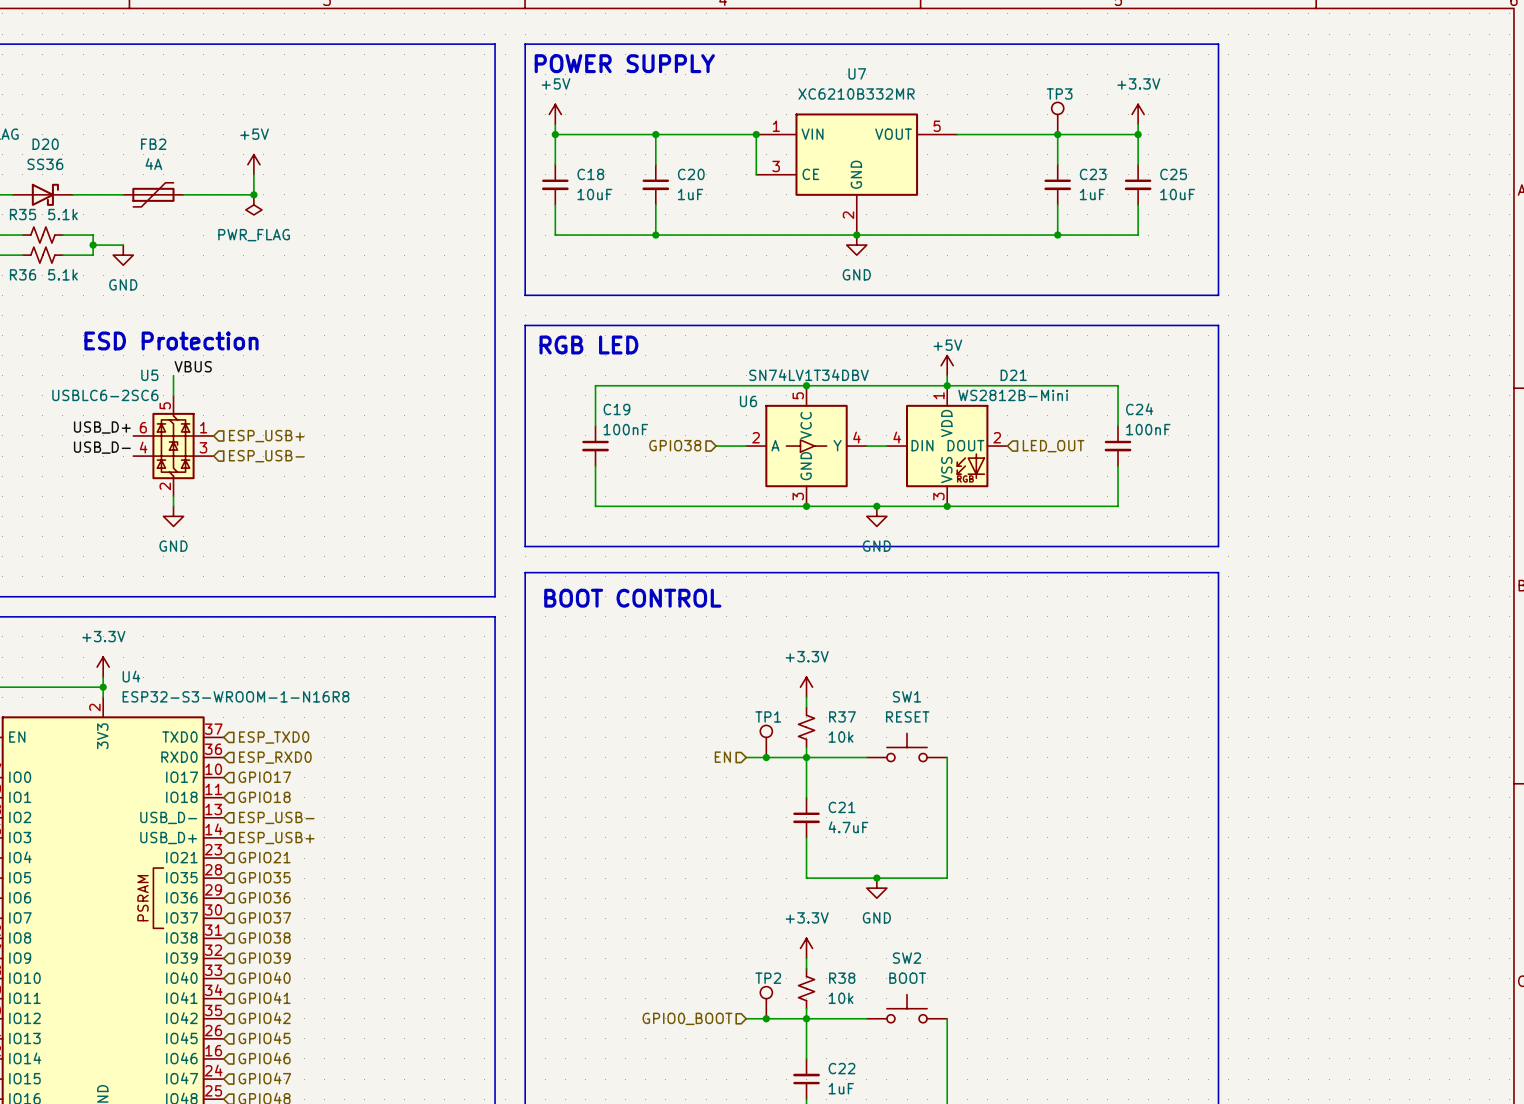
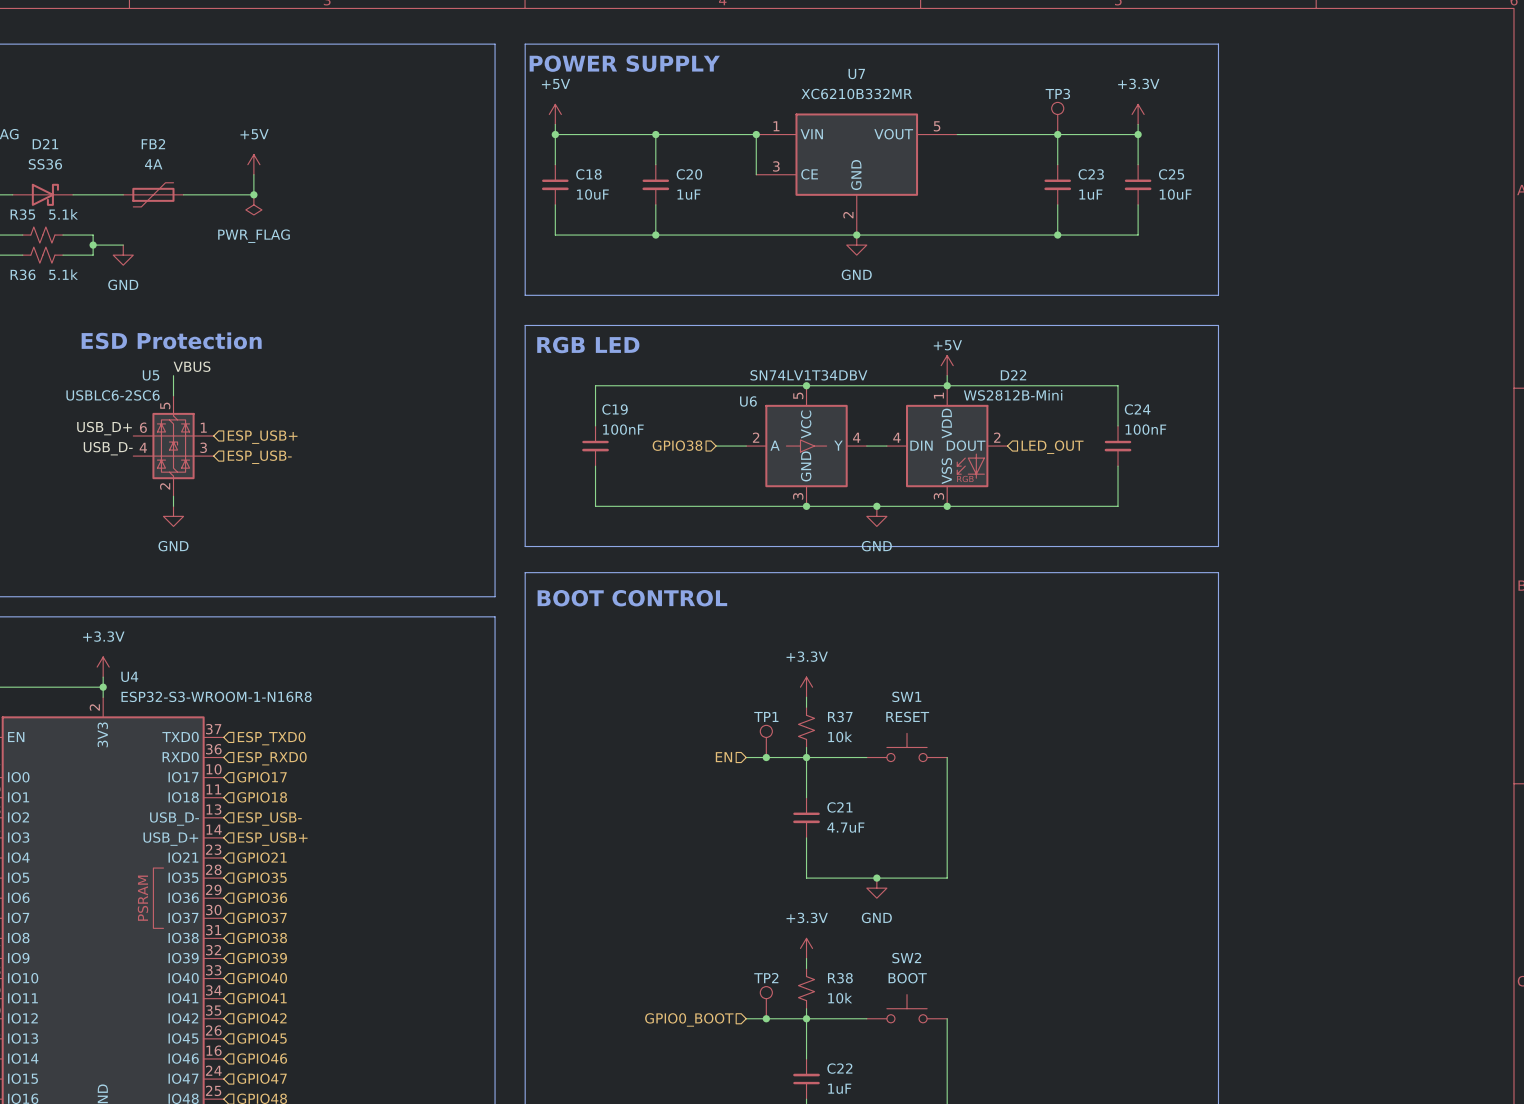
D20 name: D20 (45, 144) -> D21 (45, 144)
D21 name: D21 (1013, 375) -> D22 (1013, 375)

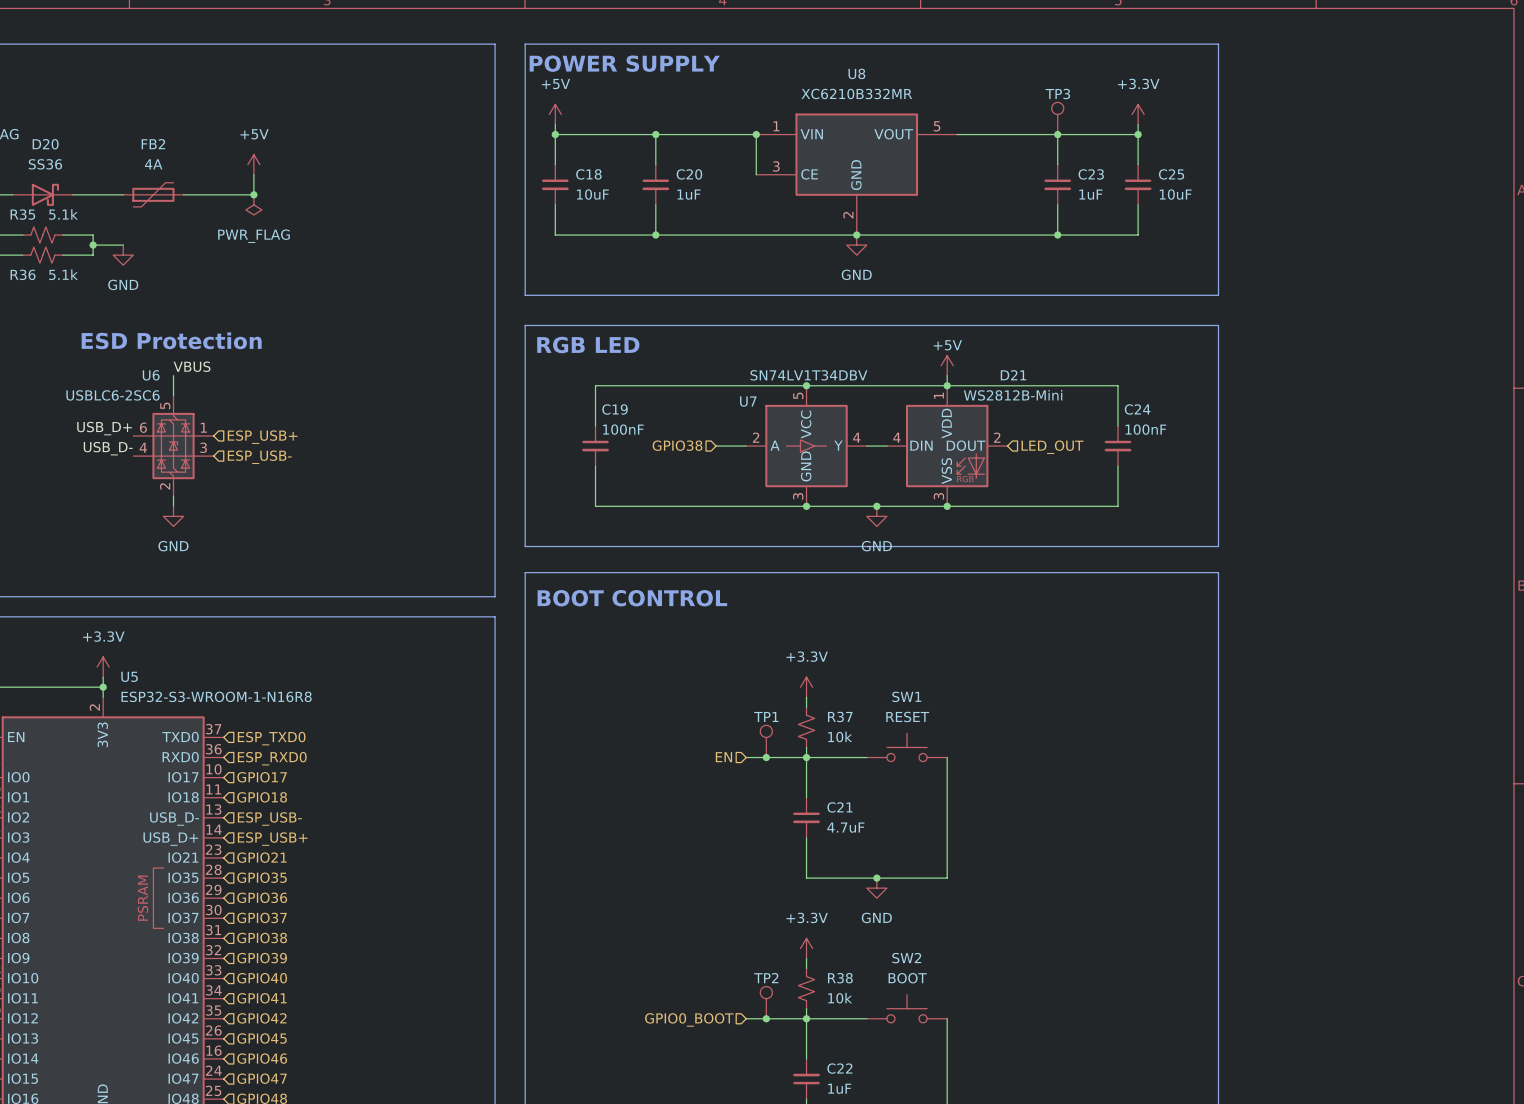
U7 name: U7 (856, 73) -> U8 (856, 73)
D21 name: D21 (45, 144) -> D20 (45, 144)
U5 name: U5 (151, 375) -> U6 (151, 375)
D22 name: D22 (1013, 375) -> D21 (1013, 375)
U6 name: U6 (748, 401) -> U7 (748, 401)
U4 name: U4 (129, 676) -> U5 (129, 676)

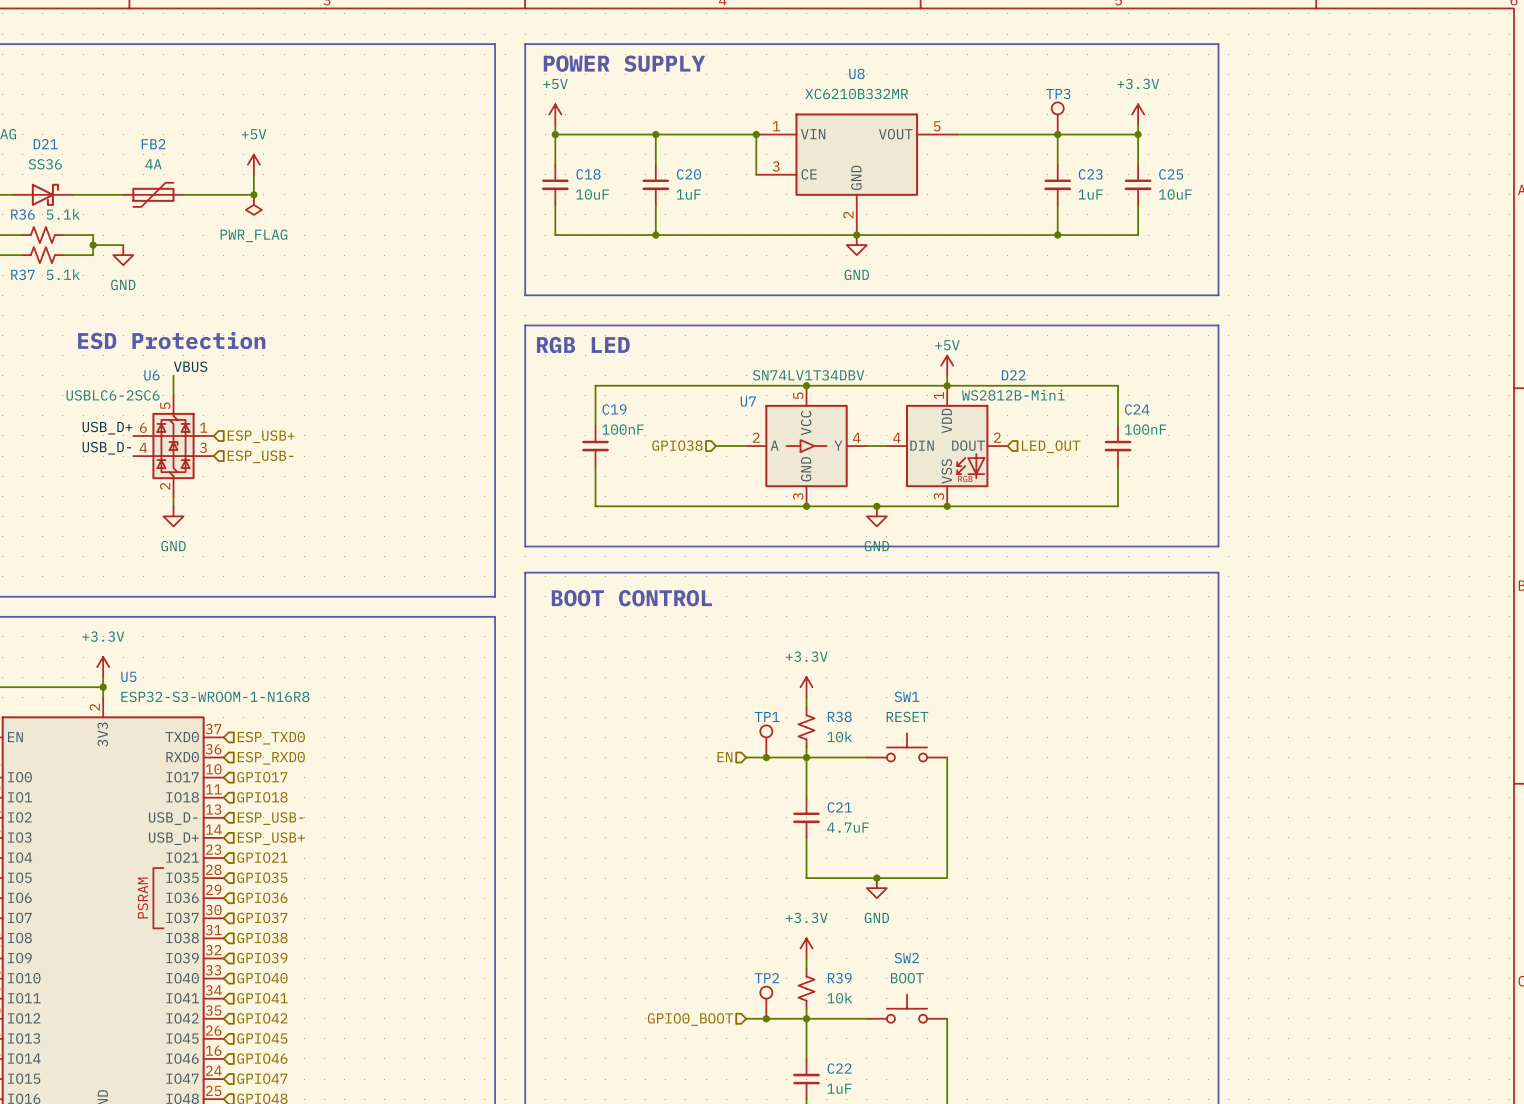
D20 name: D20 (45, 144) -> D21 (45, 144)
R35 name: R35 (22, 214) -> R36 (22, 214)
R36 name: R36 (23, 274) -> R37 (22, 274)
D21 name: D21 (1013, 375) -> D22 (1013, 375)
R37 name: R37 (840, 716) -> R38 (839, 716)
R38 name: R38 (840, 978) -> R39 (839, 978)

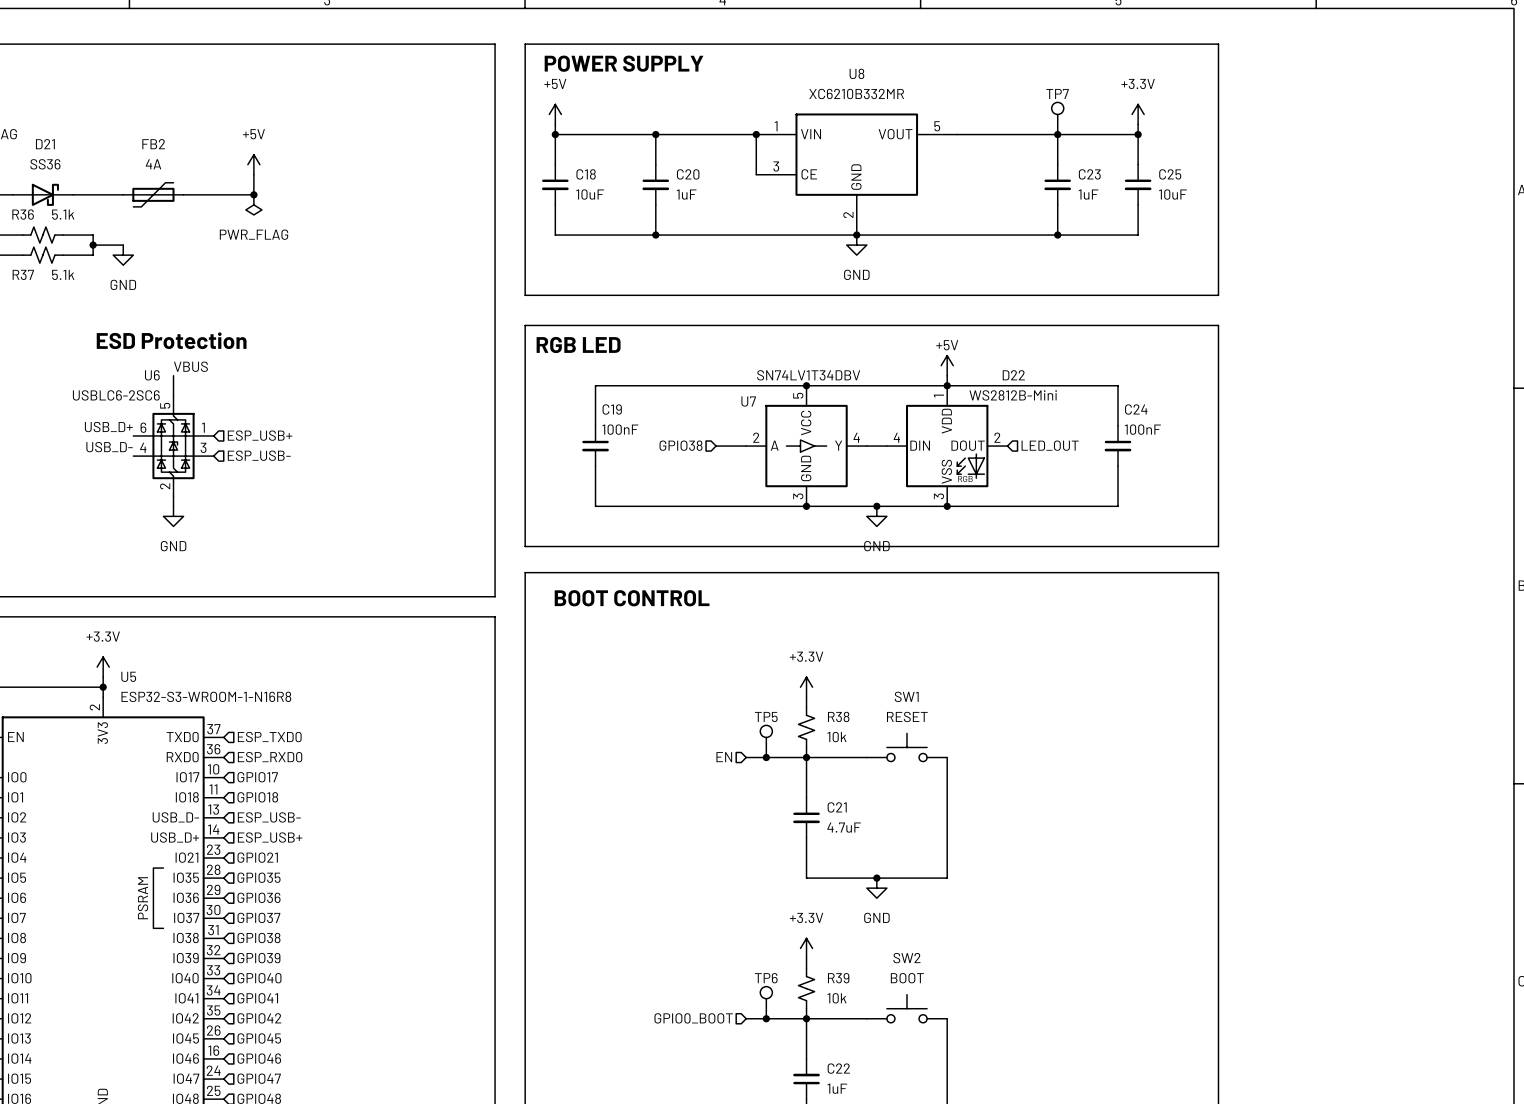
TP3 name: TP3 (1058, 93) -> TP7 (1057, 93)
TP1 name: TP1 (767, 716) -> TP5 (766, 717)
TP2 name: TP2 (766, 978) -> TP6 (766, 978)

